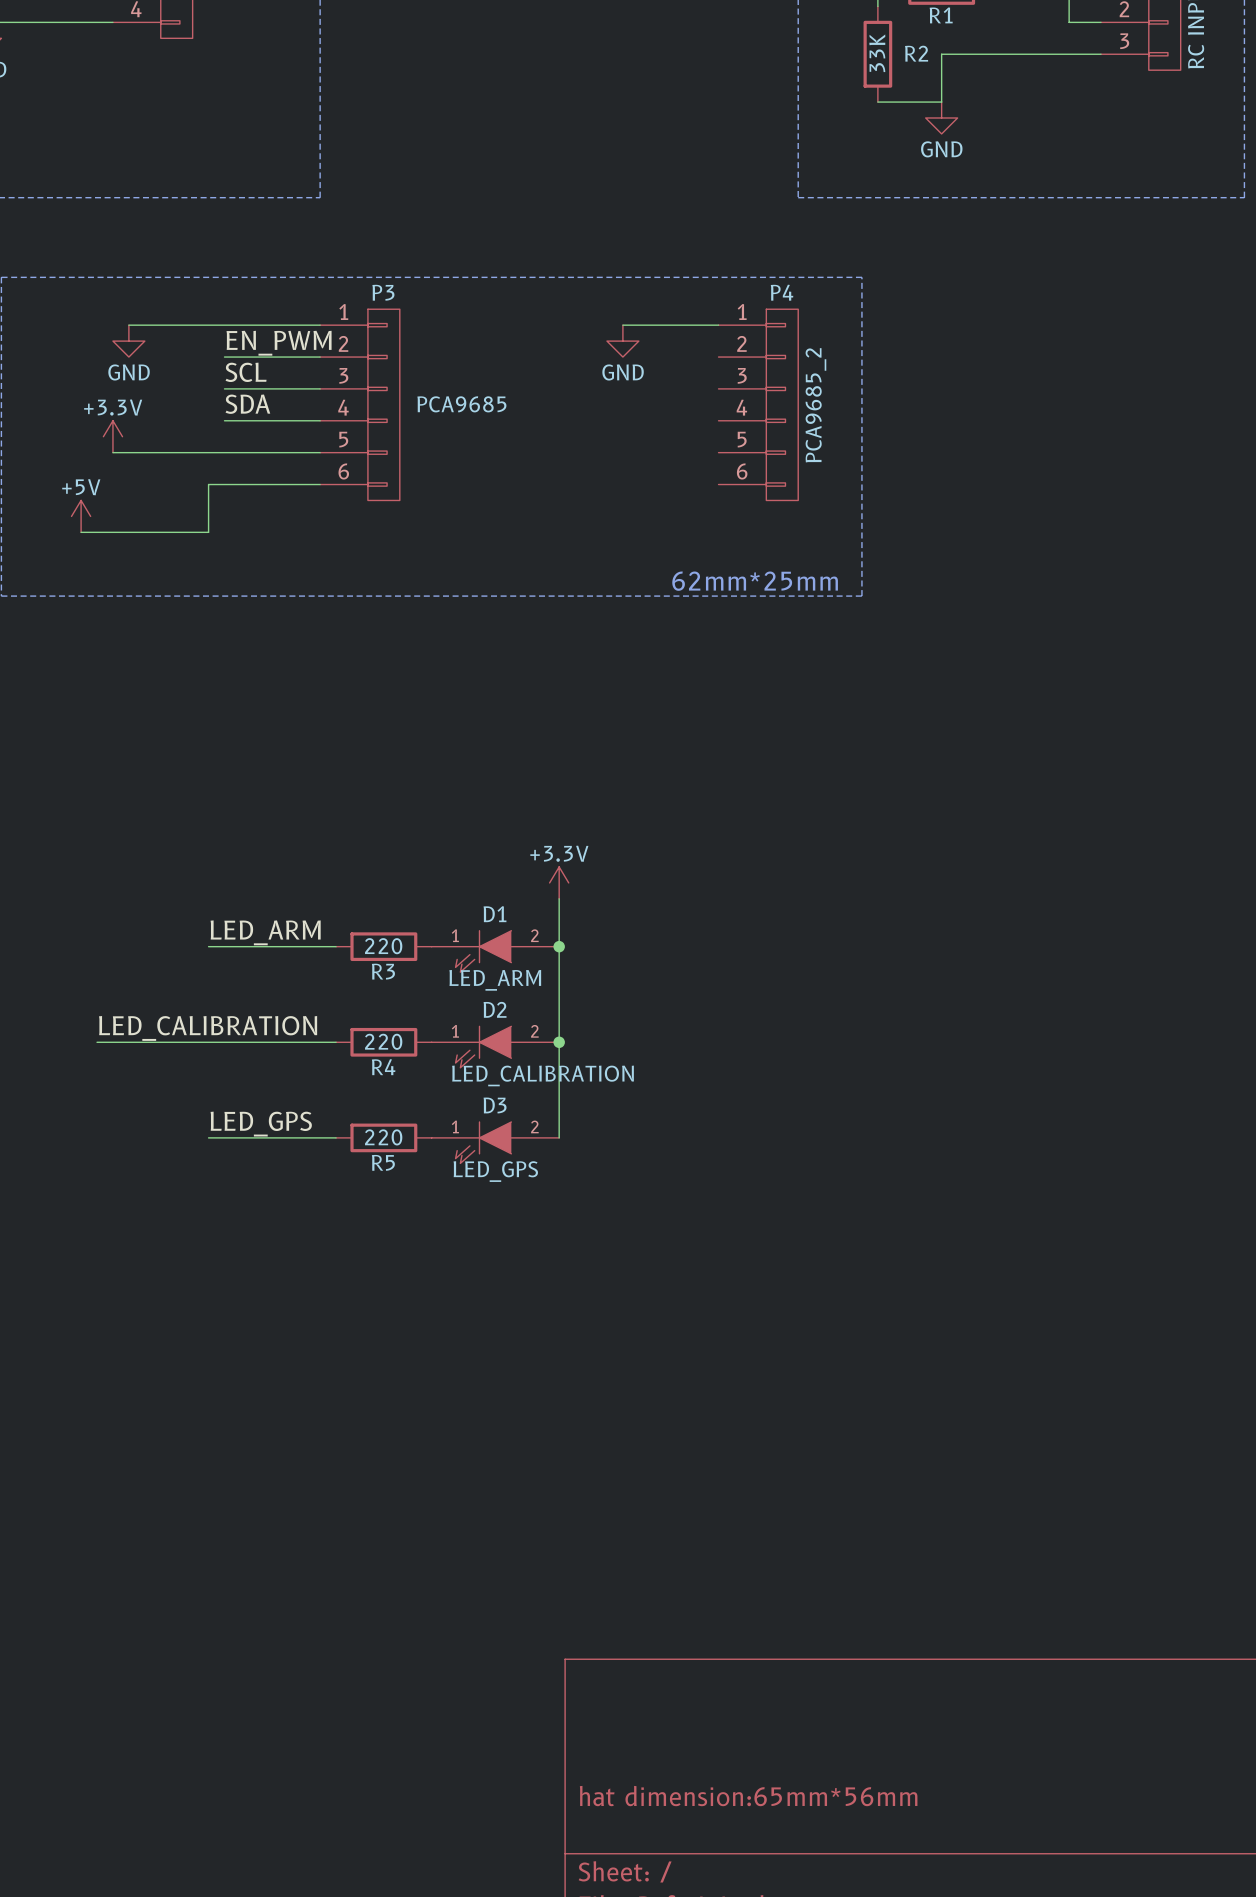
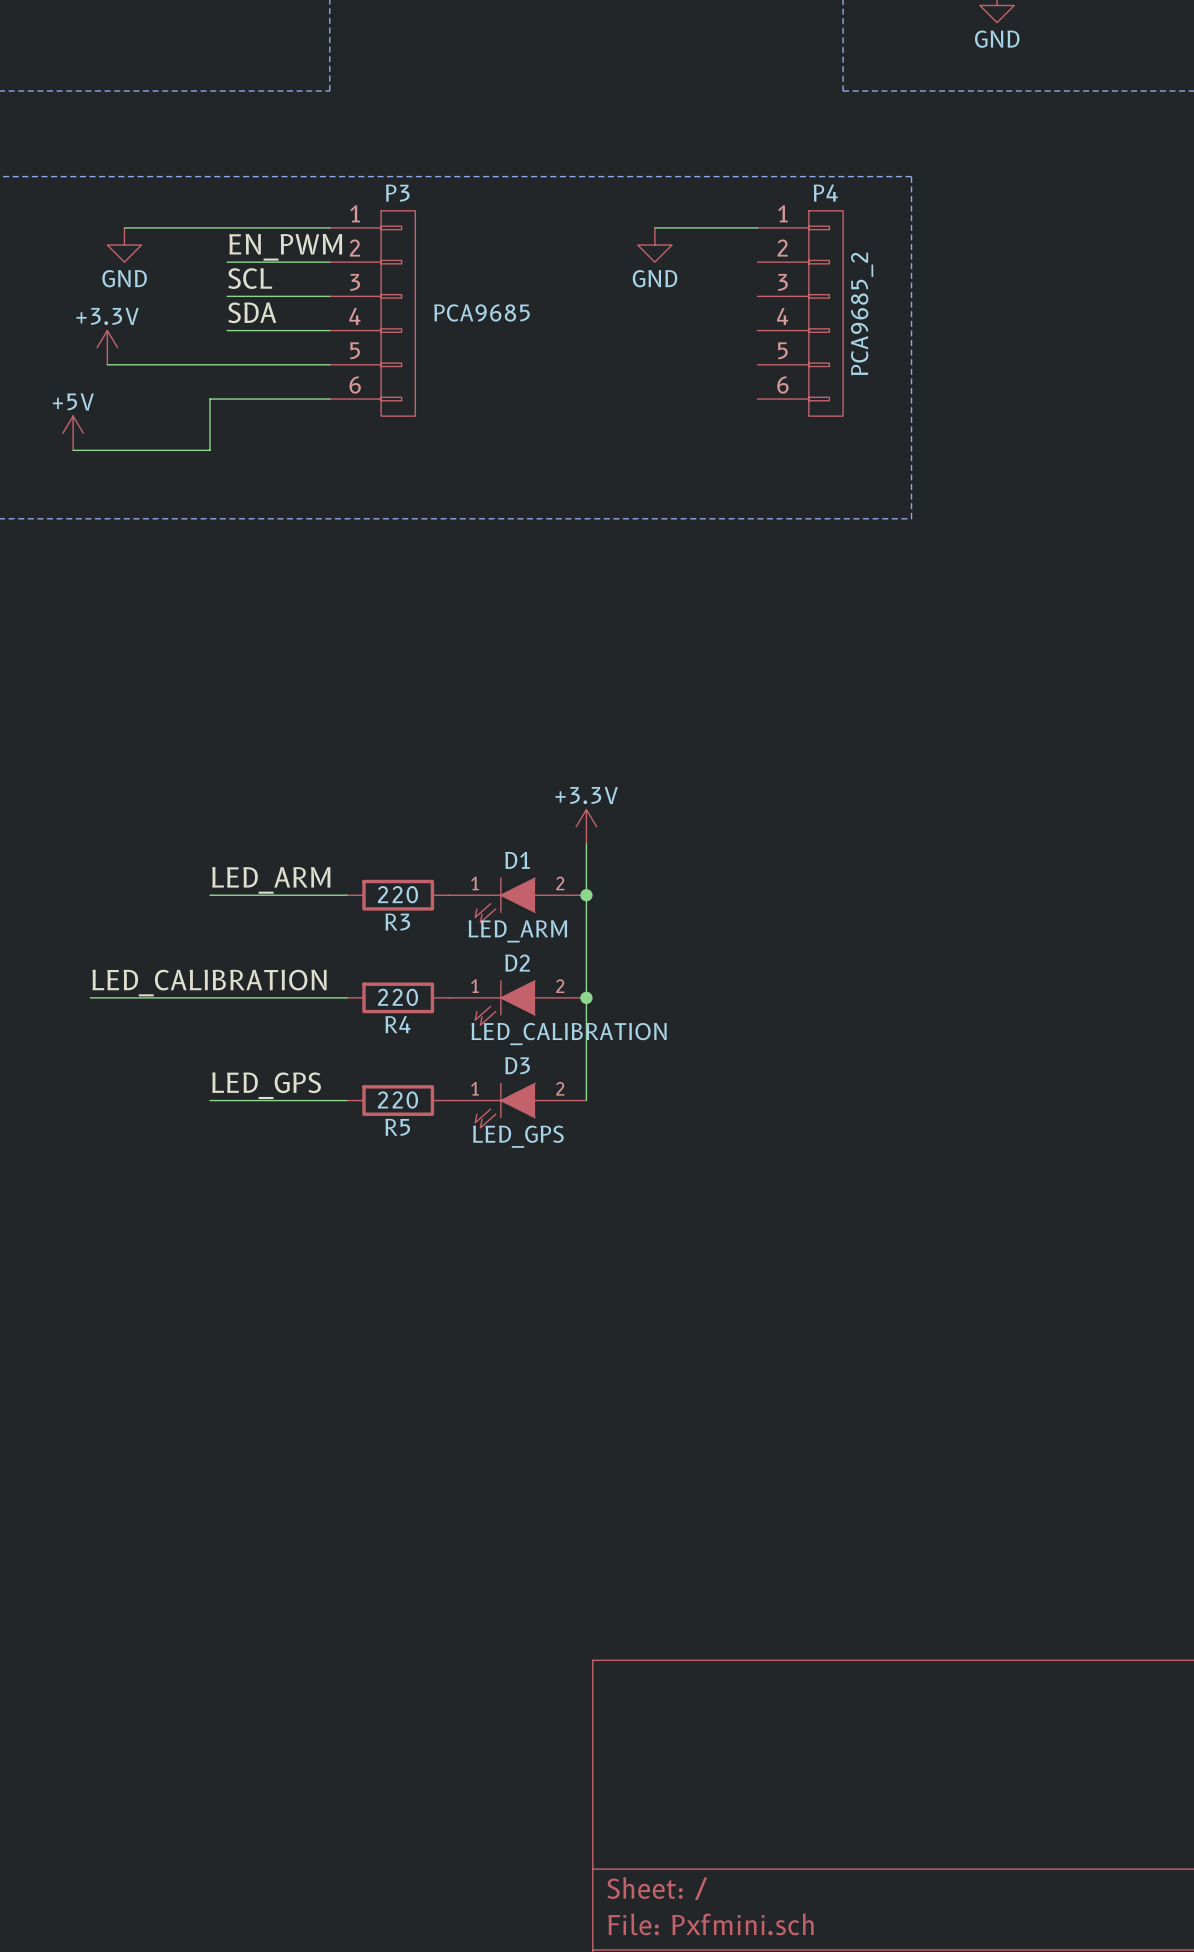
text: 62mm*25mm (755, 581) -> none
title block: hat dimension:65mm*56mm (748, 1796) -> none

